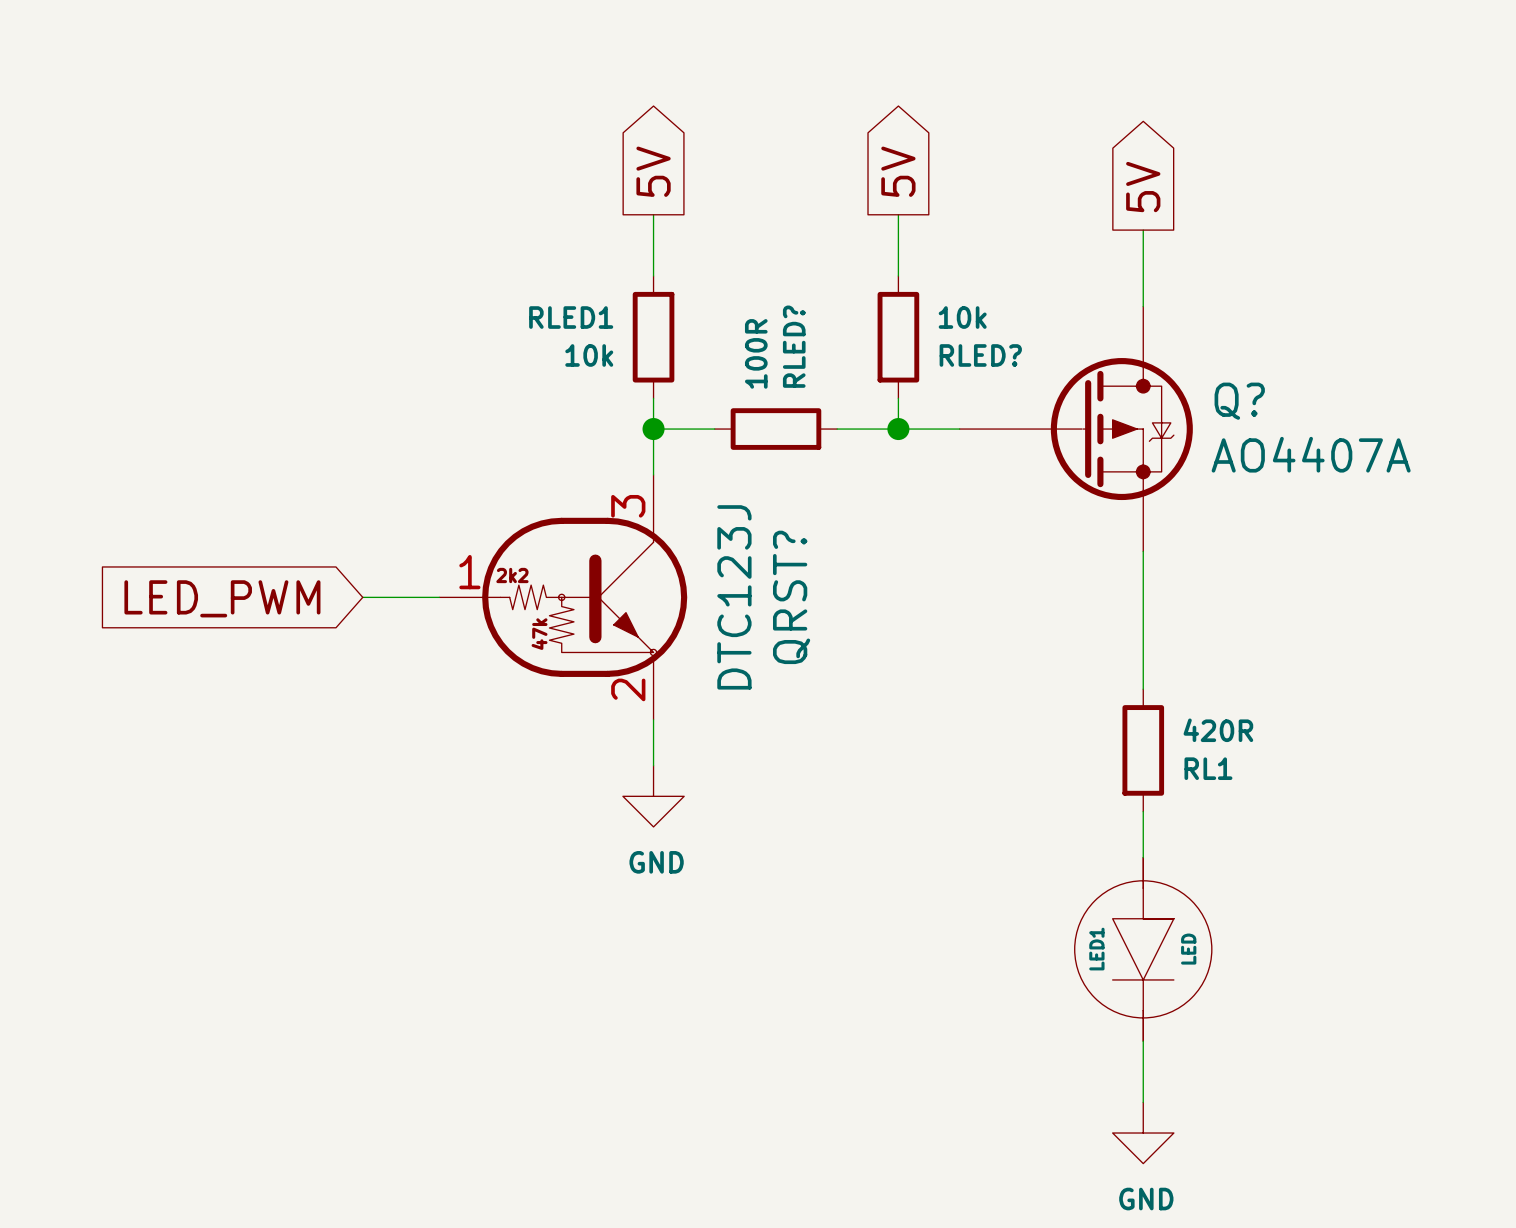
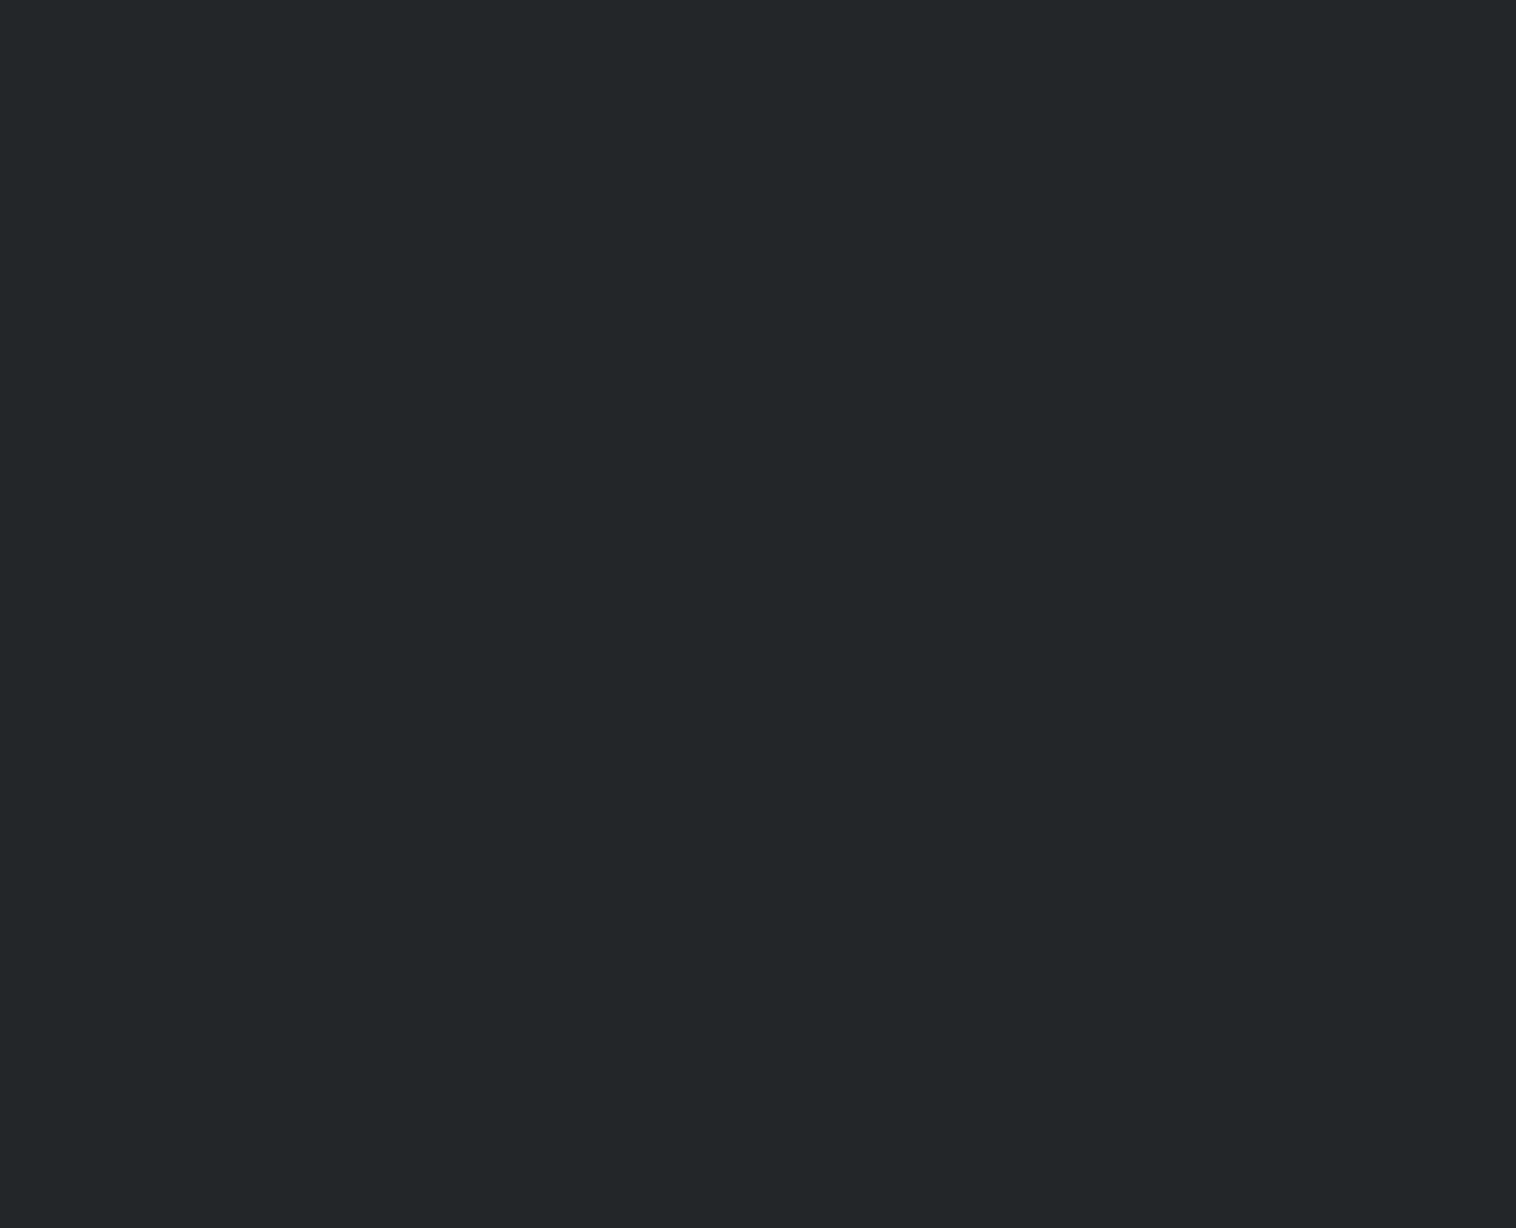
global label: 5V (653, 171) -> none
global label: 5V (898, 171) -> none
global label: 5V (1143, 187) -> none
wire: (653, 214) (653, 275) -> none
wire: (898, 214) (898, 275) -> none
wire: (1143, 230) (1143, 306) -> none
RLED1: 10k (653, 337) -> none
RLED?: 10k (898, 337) -> none
wire: (653, 398) (653, 474) -> none
wire: (898, 398) (898, 429) -> none
wire: (653, 429) (714, 429) -> none
junction: (653, 429) -> none
RLED?: 100R (775, 429) -> none
wire: (837, 429) (959, 429) -> none
junction: (898, 429) -> none
Q?: AO4407A (1076, 429) -> none
wire: (1143, 551) (1143, 689) -> none
wire: (362, 597) (439, 597) -> none
QRST?: DTC123J (563, 597) -> none
global label: LED_PWM (222, 598) -> none
wire: (653, 719) (653, 765) -> none
RL1: 420R (1143, 750) -> none
power symbol: GND (653, 796) -> none
wire: (1143, 811) (1143, 857) -> none
LED1: LED (1143, 949) -> none
wire: (1143, 1041) (1143, 1102) -> none
power symbol: GND (1143, 1133) -> none

